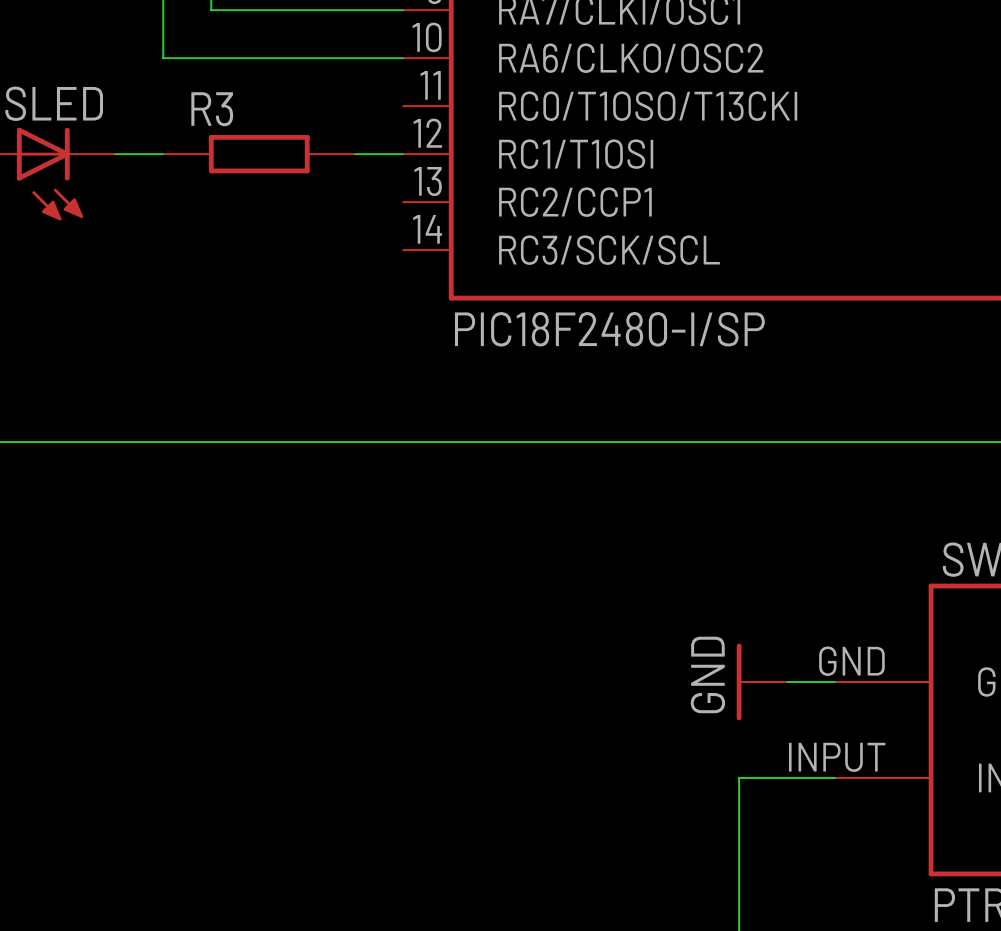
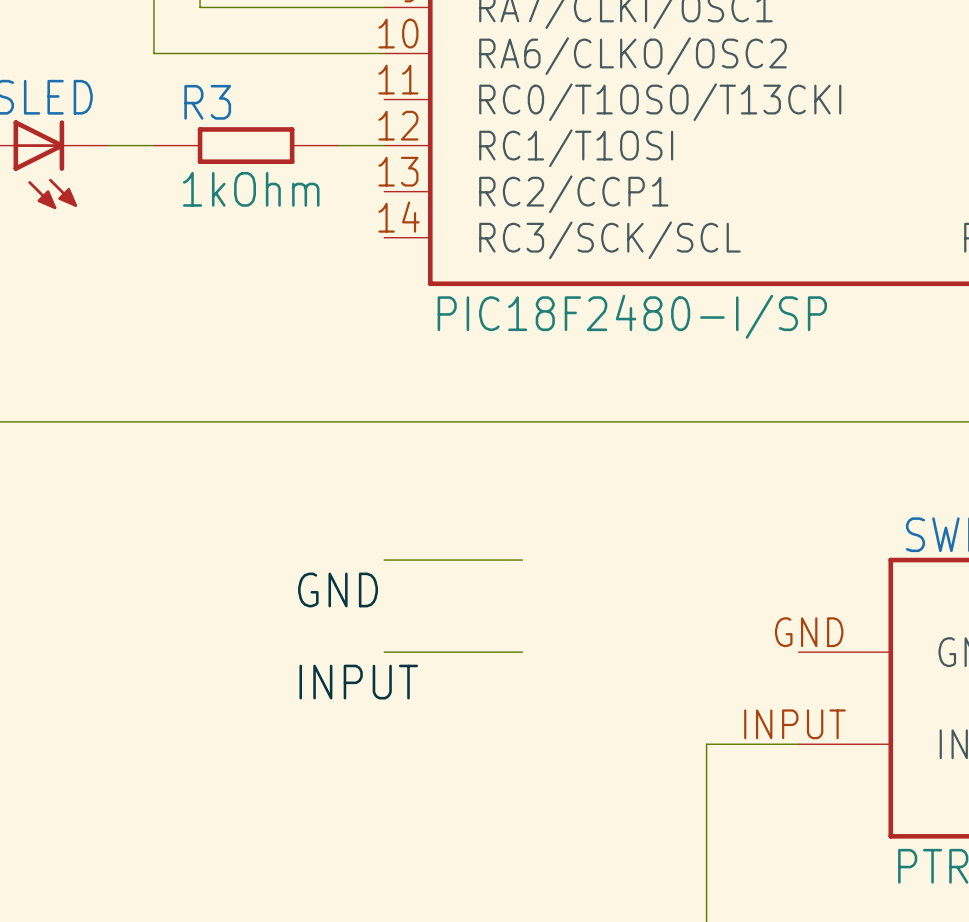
R3 value: none -> 1kOhm (251, 189)
wire: none -> (384, 560) (522, 560)
label: none -> GND (338, 589)
wire: none -> (384, 652) (522, 652)
power symbol: GND (761, 681) -> none
wire: (787, 681) (835, 681) -> none
label: none -> INPUT (358, 682)

